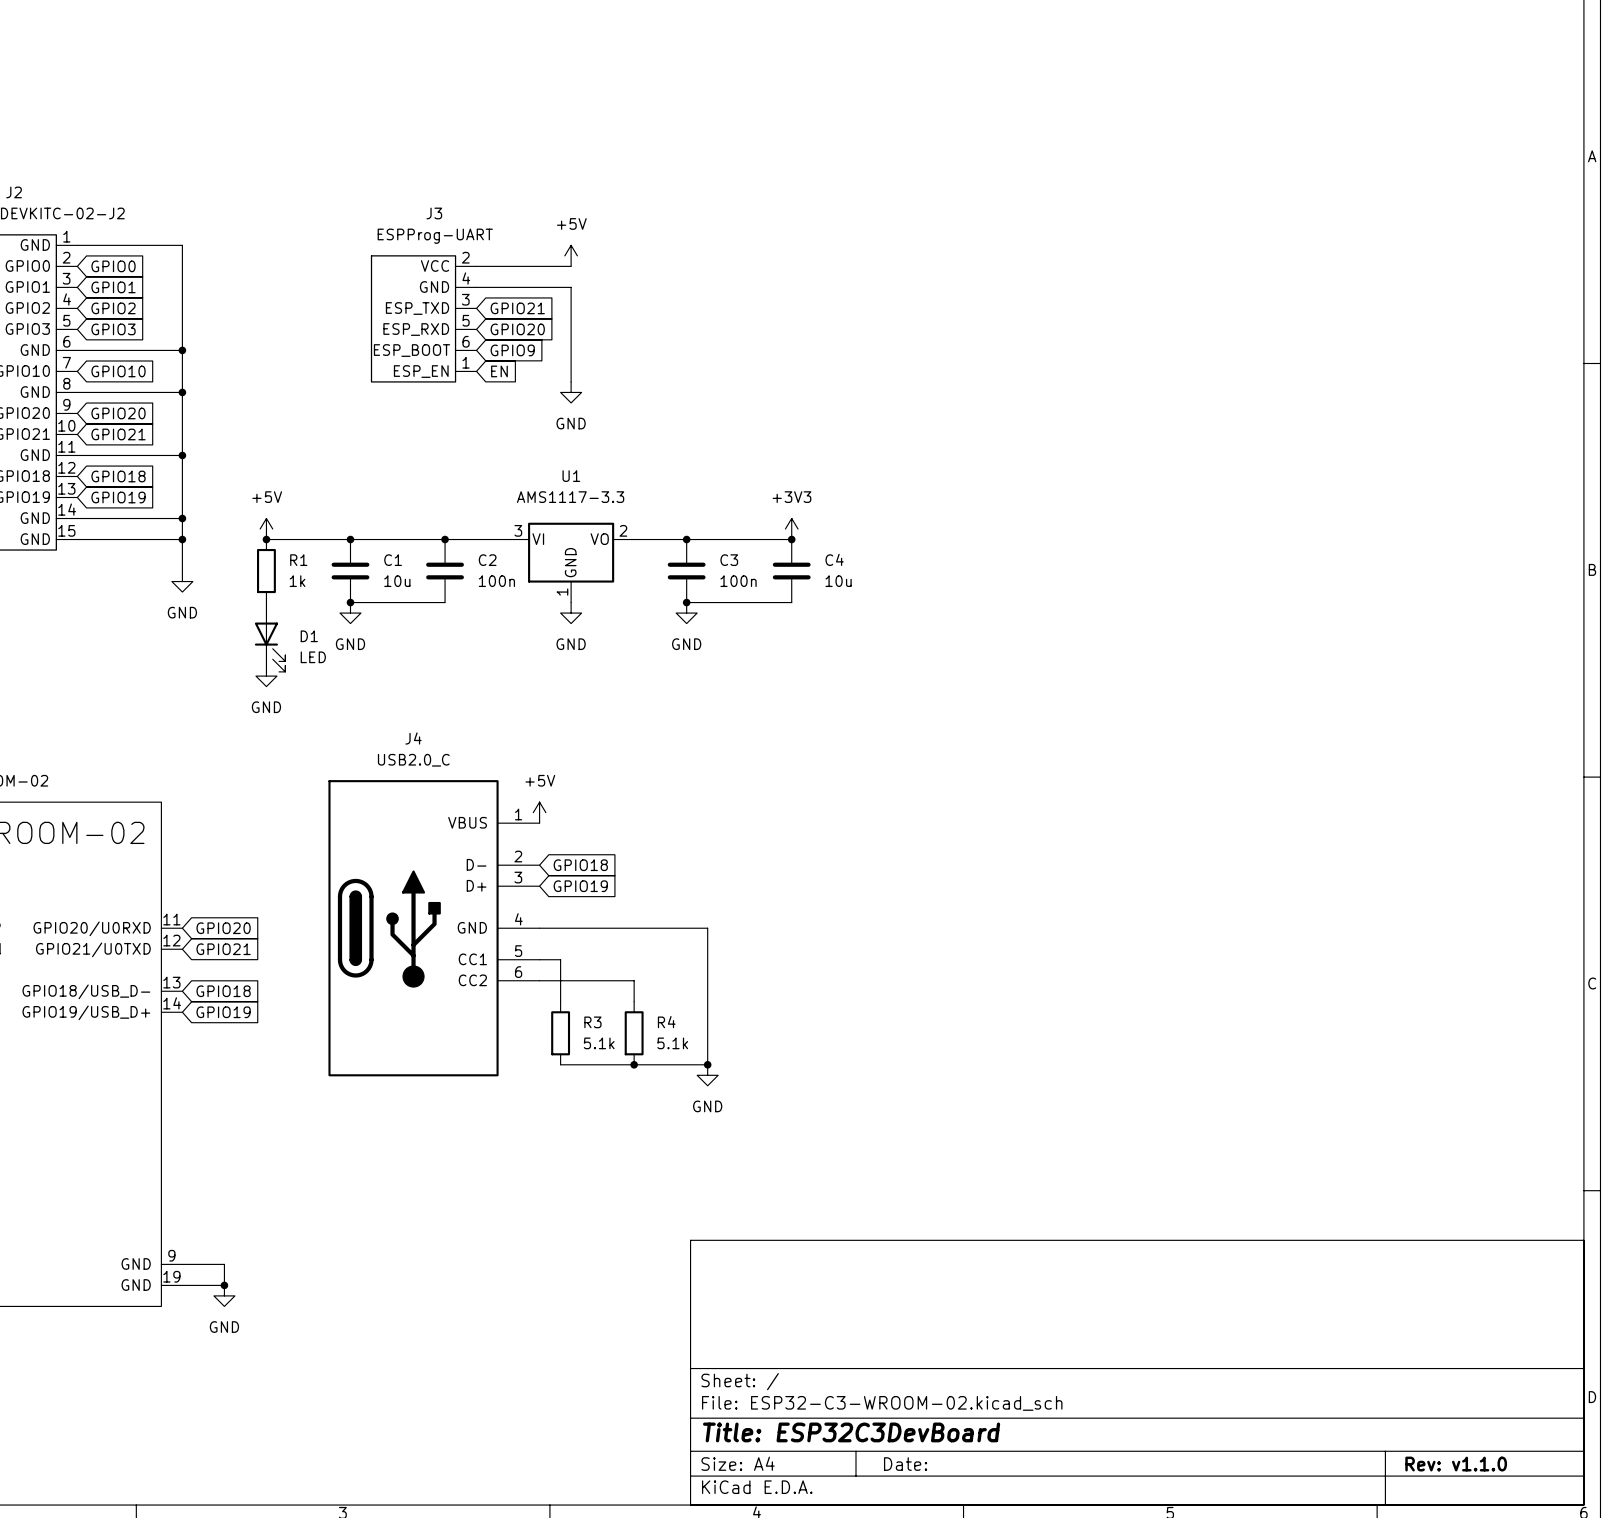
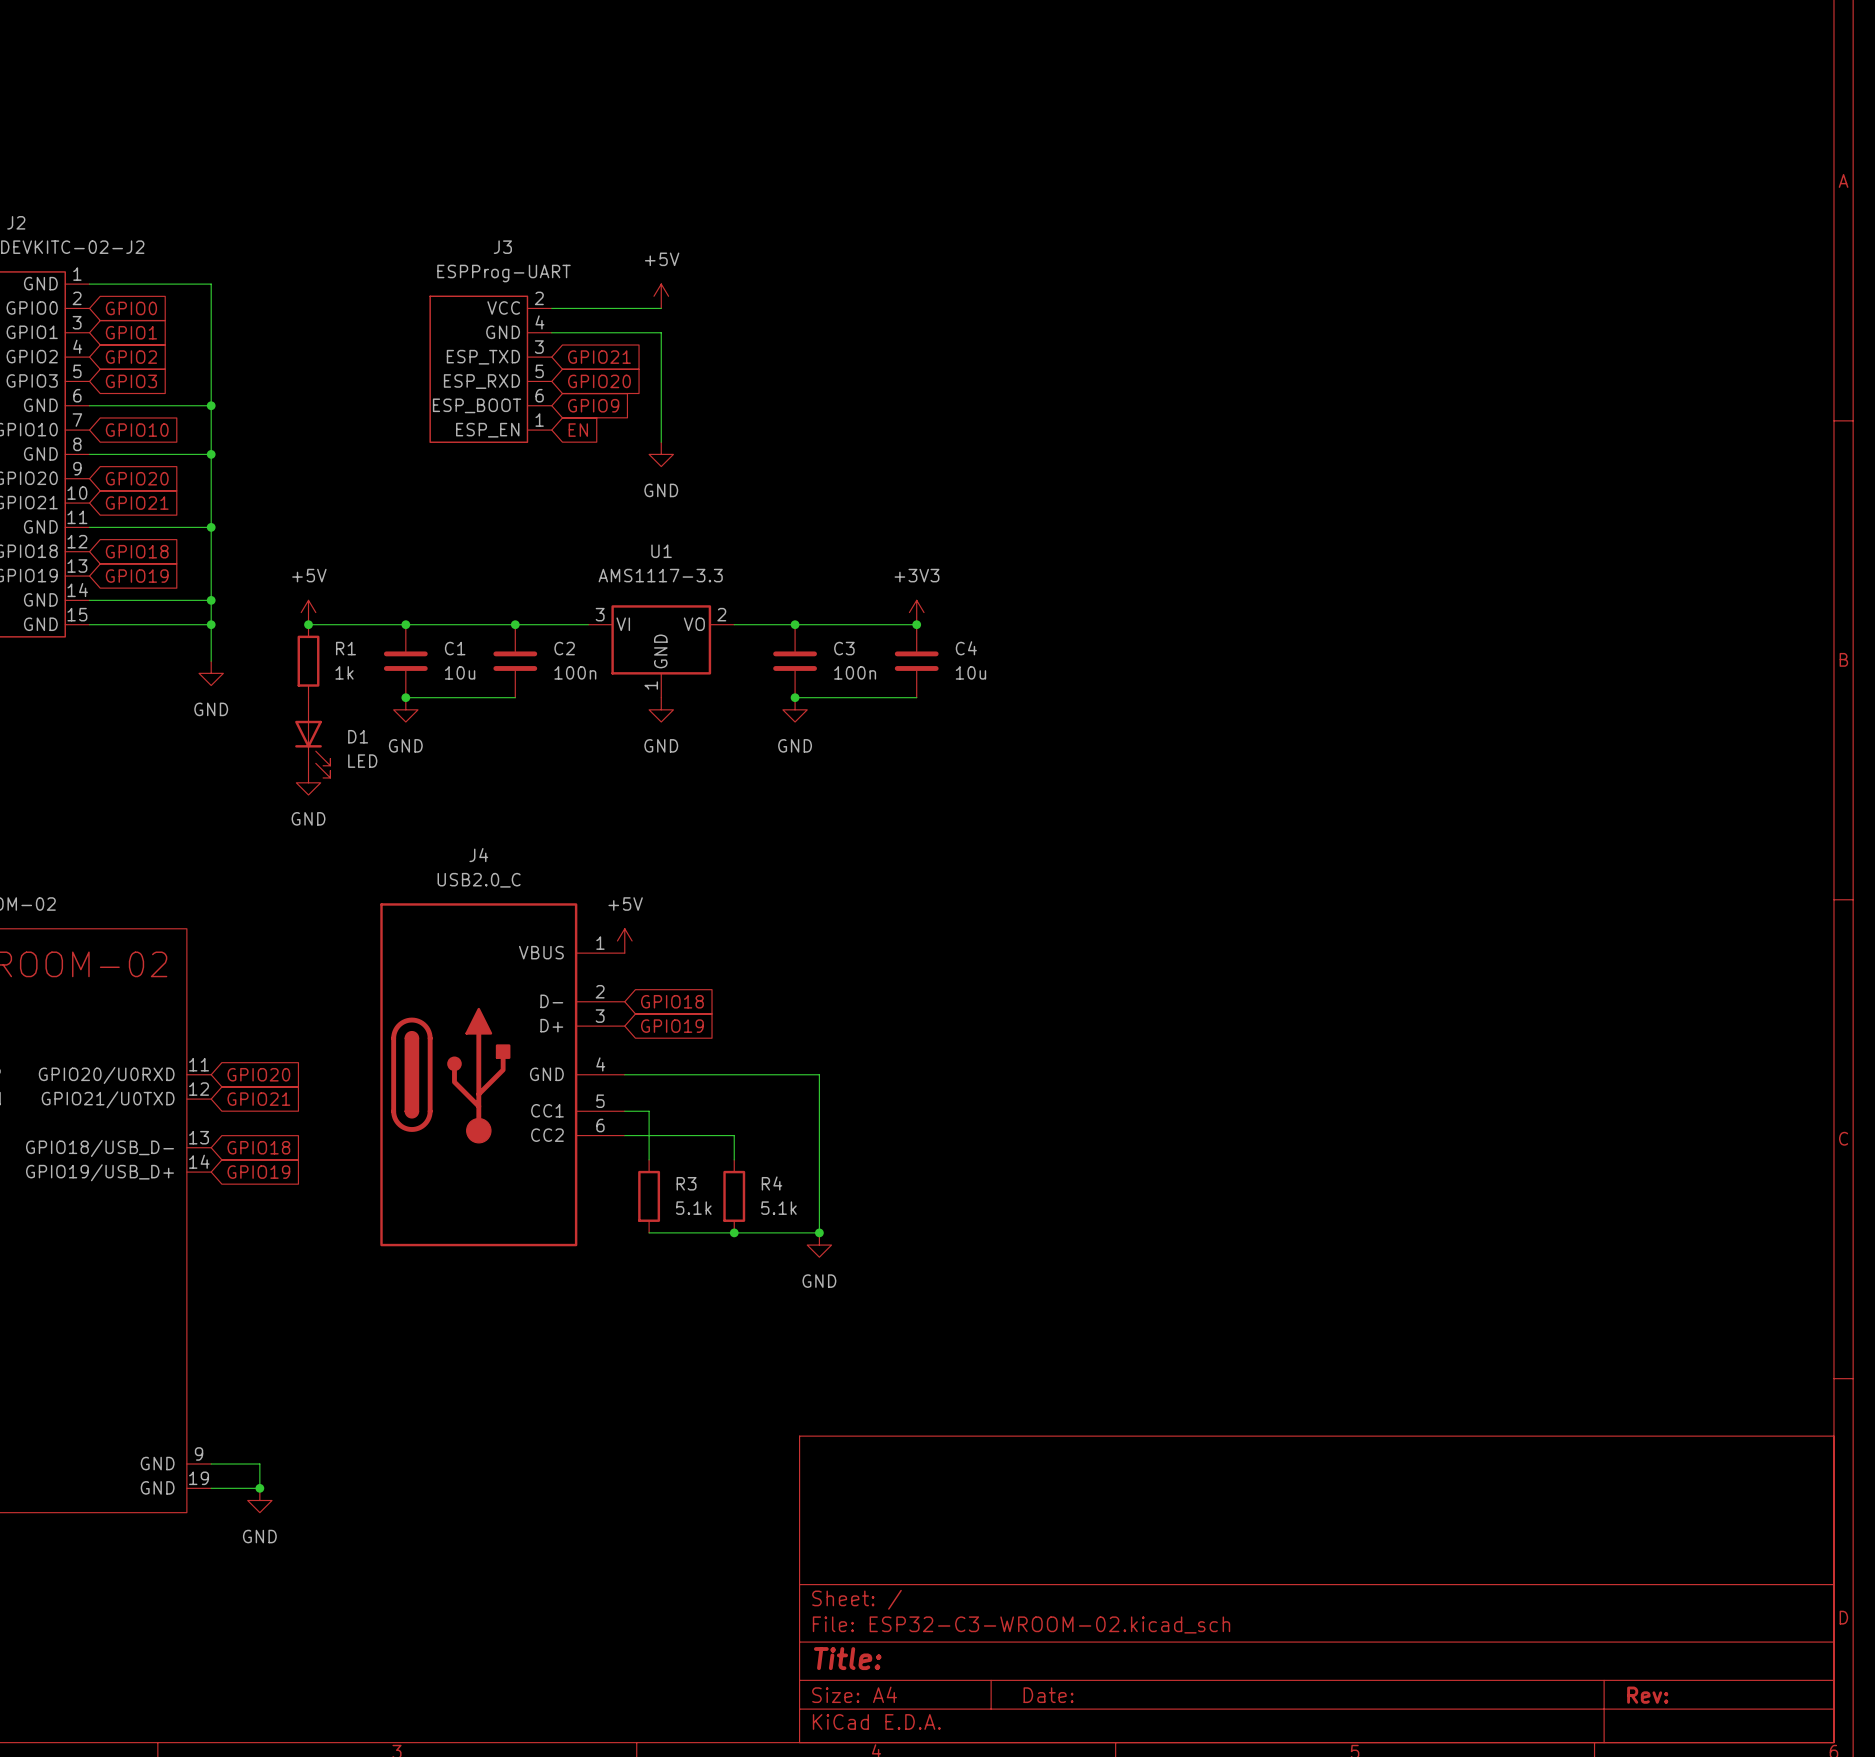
title block: Title: ESP32C3DevBoard (851, 1432) -> Title: (847, 1658)
title block: Rev: v1.1.0 (1456, 1464) -> Rev: (1647, 1695)

